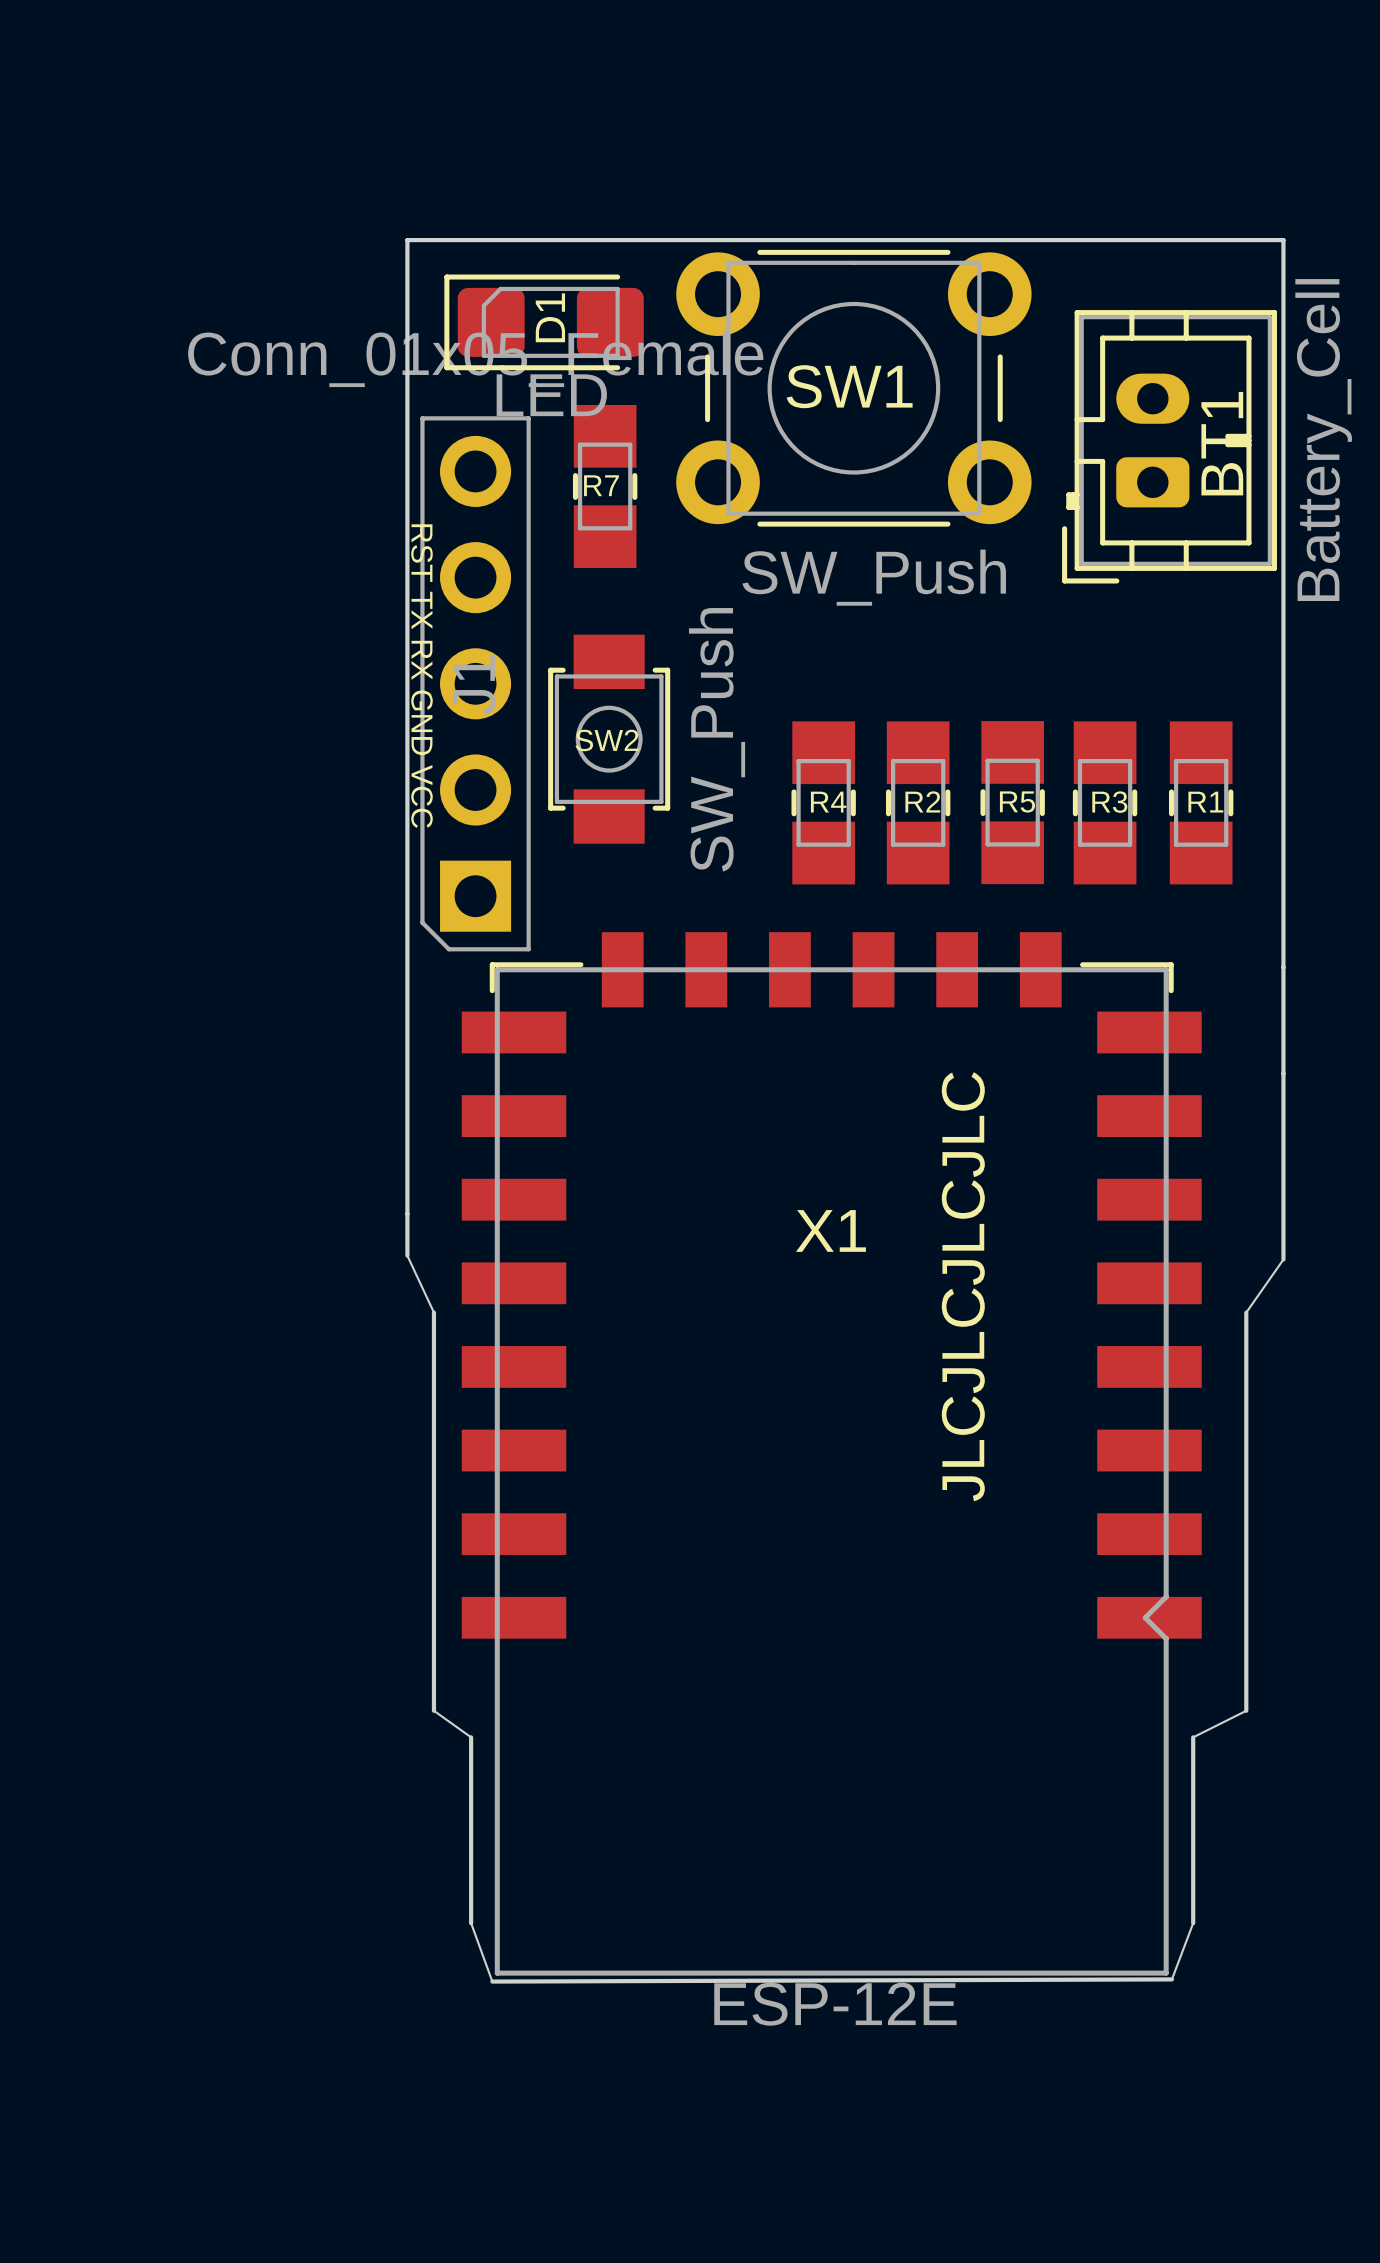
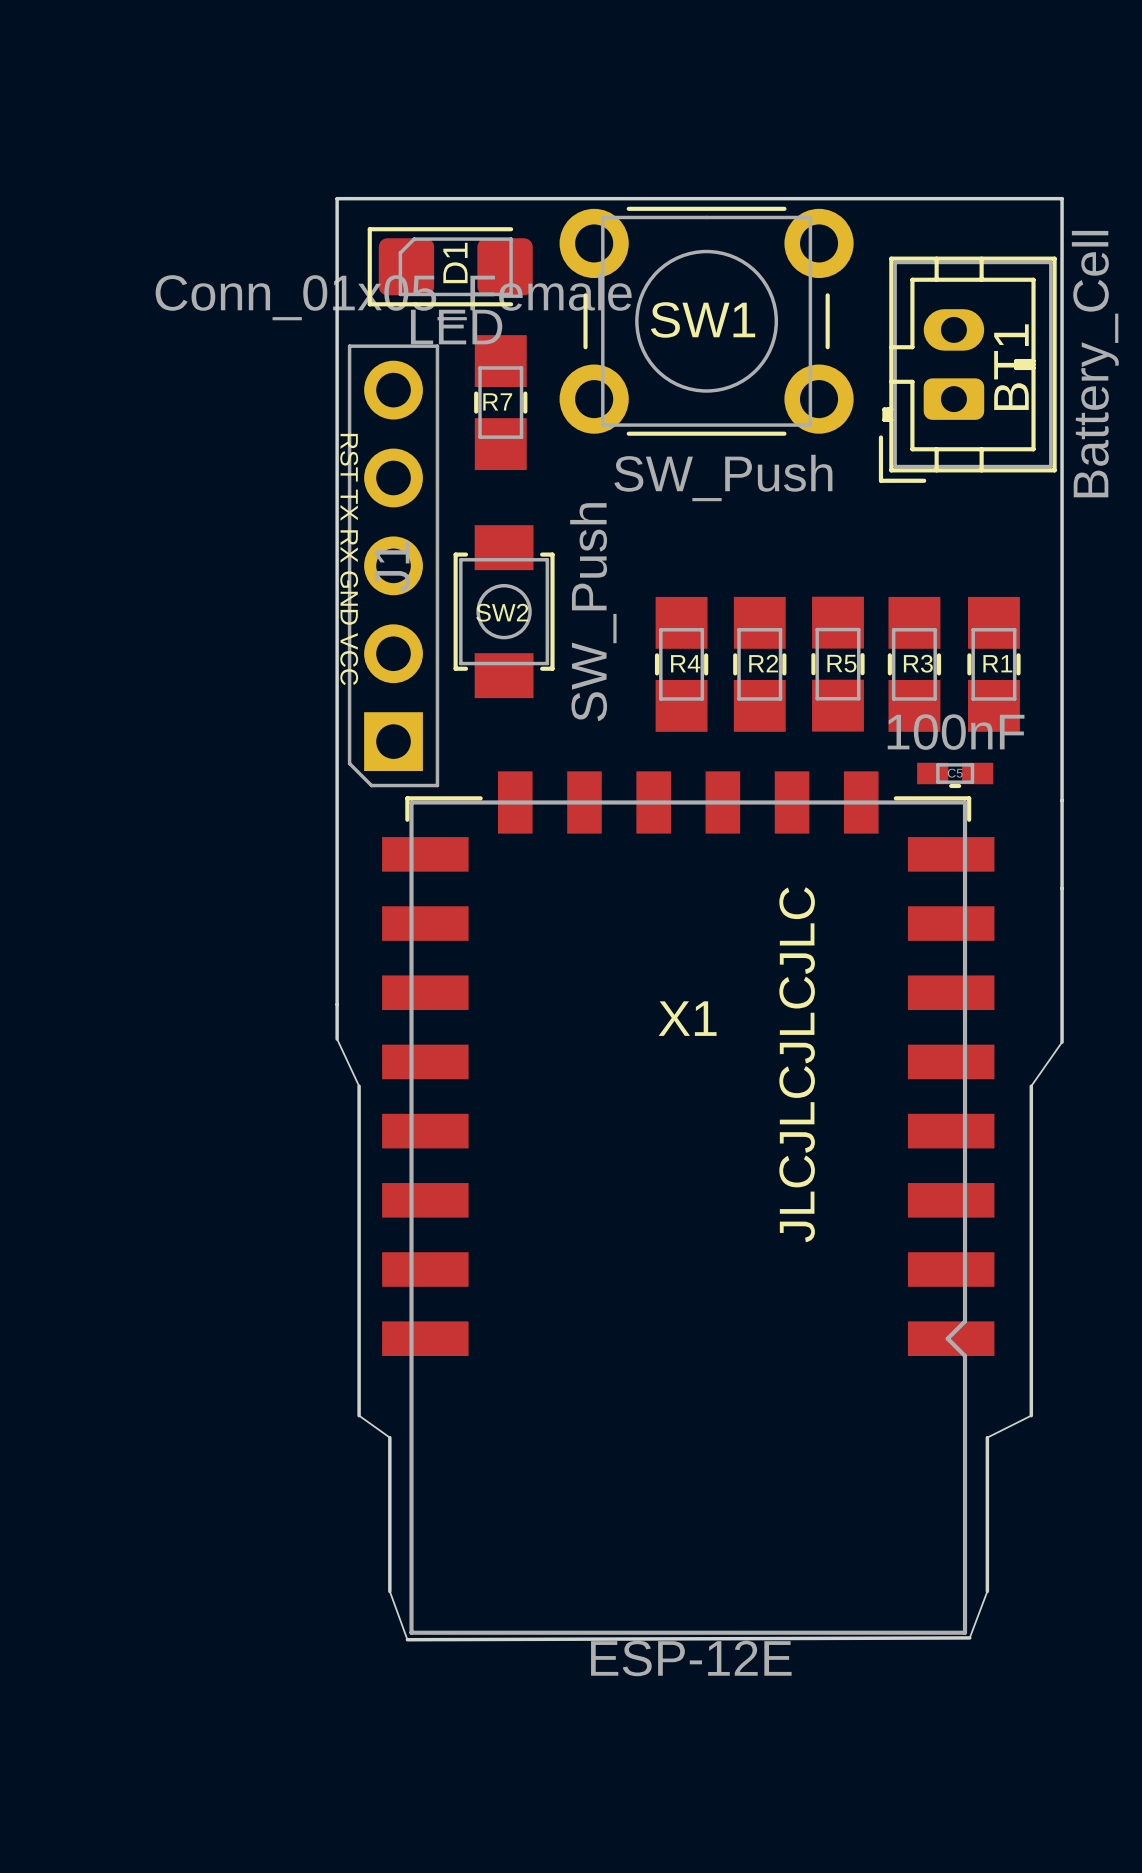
C5: none -> 100nF (955, 775)

